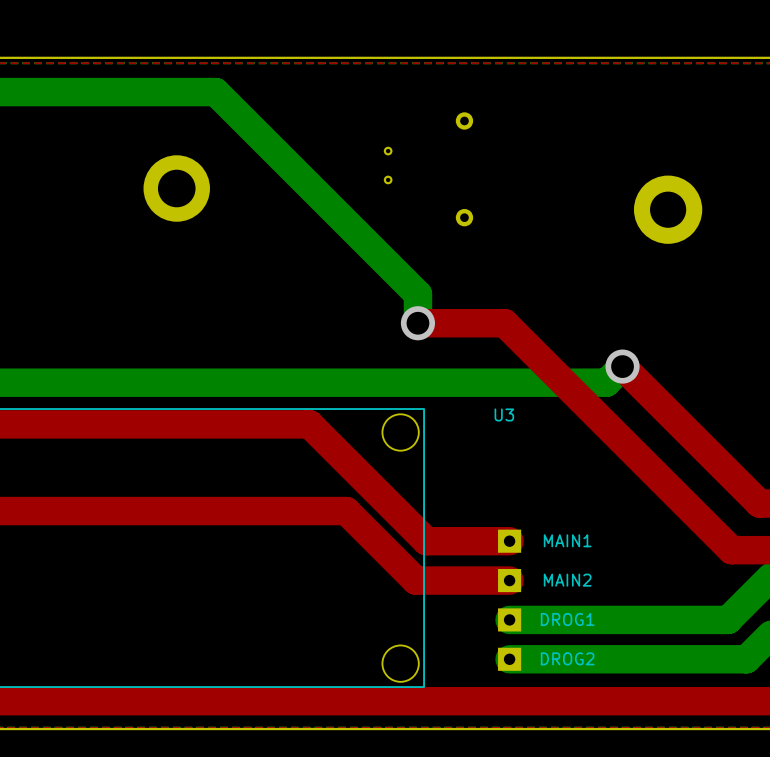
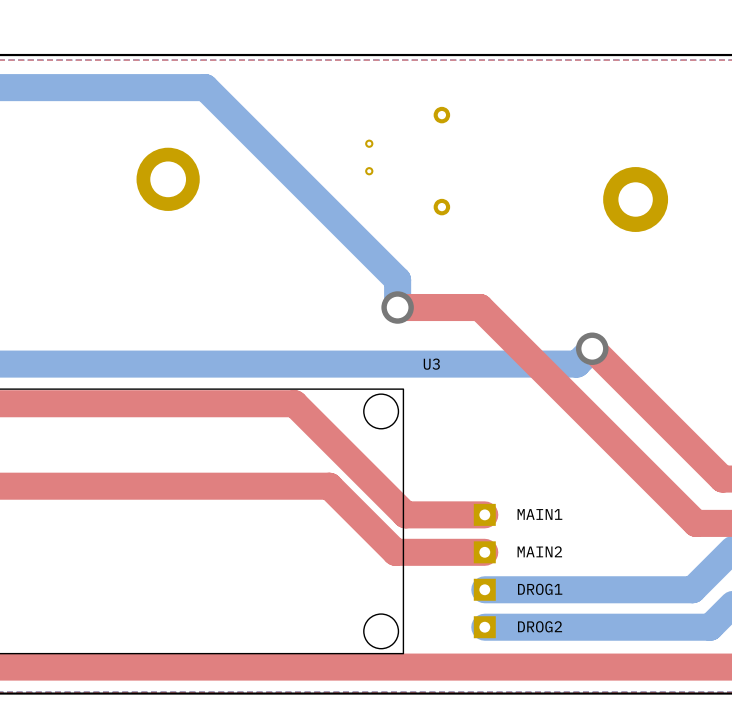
U3 name position: U3 (504, 414) -> U3 (431, 364)

